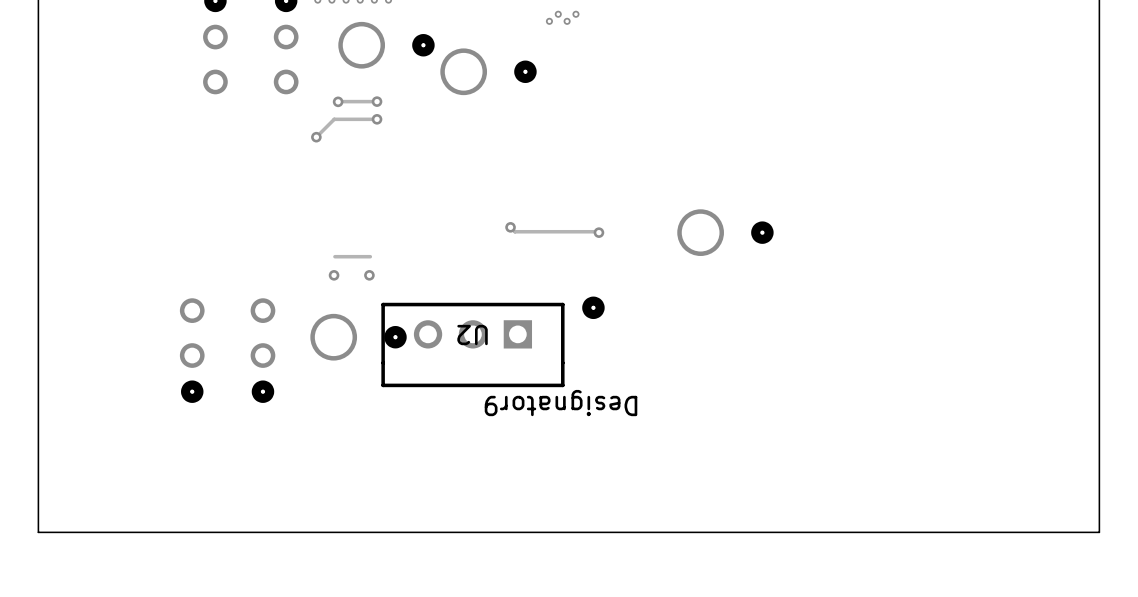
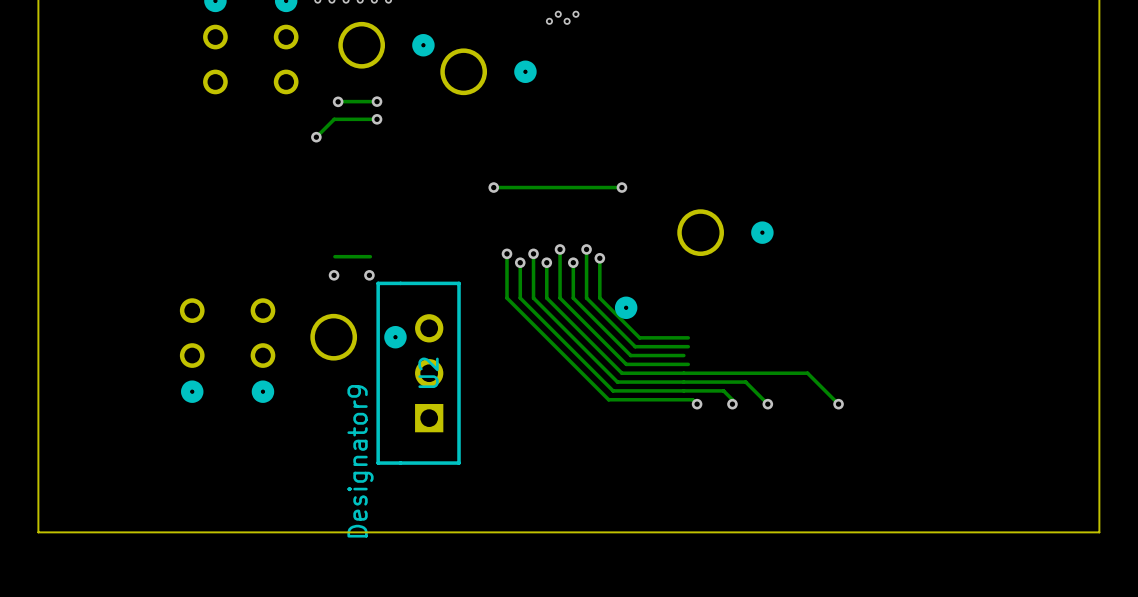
via: none -> (493, 187)
track: none -> (621, 187) (493, 187)
via: none -> (621, 187)
track: (510, 227) (514, 231) (598, 231) -> none
via: (510, 227) -> none
via: (598, 232) -> none
track: none -> (560, 249) (560, 298) (626, 364) (688, 364)
via: none -> (560, 249)
track: none -> (586, 249) (586, 298) (635, 346) (688, 346)
via: none -> (586, 249)
track: none -> (507, 253) (507, 298) (608, 399) (692, 399) (697, 404)
via: none -> (507, 253)
track: none -> (533, 253) (533, 298) (617, 382) (745, 382) (767, 404)
via: none -> (533, 253)
track: none -> (599, 258) (599, 298) (639, 337) (688, 337)
via: none -> (599, 258)
track: none -> (520, 262) (520, 298) (613, 390) (723, 390) (732, 399) (732, 404)
via: none -> (520, 262)
track: none -> (546, 262) (546, 298) (621, 373) (807, 373) (838, 404)
via: none -> (546, 262)
track: none -> (573, 262) (573, 298) (630, 355) (683, 355)
via: none -> (573, 262)
part position: (593, 307) -> (626, 307)
U2 rotation: 0° (472, 344) -> 90° clockwise (418, 373)
via: none -> (697, 404)
via: none -> (732, 404)
via: none -> (767, 404)
via: none -> (838, 404)

